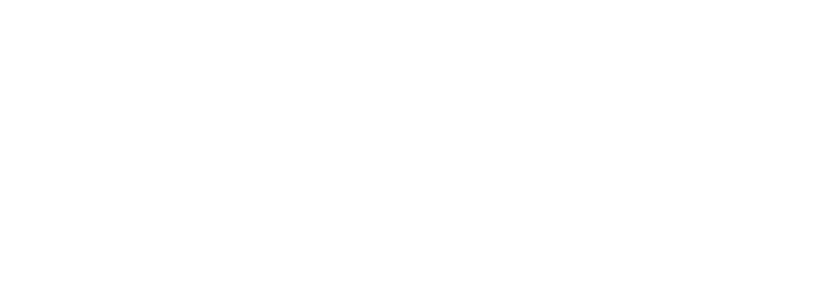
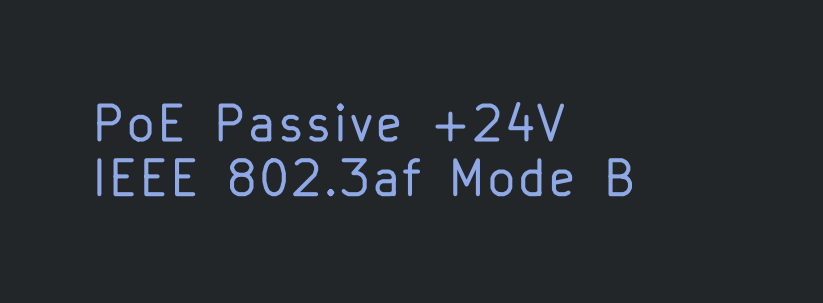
text: none -> PoE Passive +24V (330, 121)
text: none -> IEEE 802.3af Mode B (364, 177)

